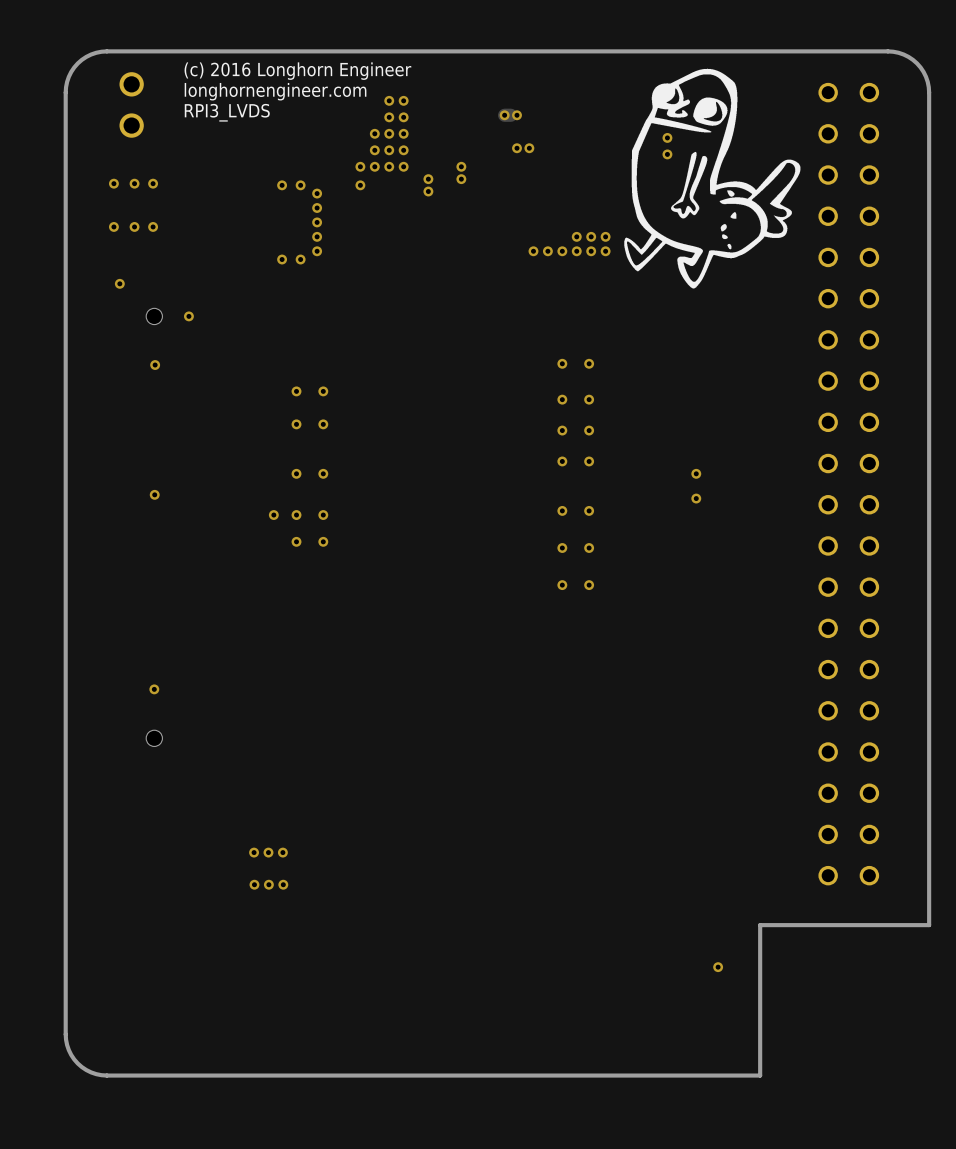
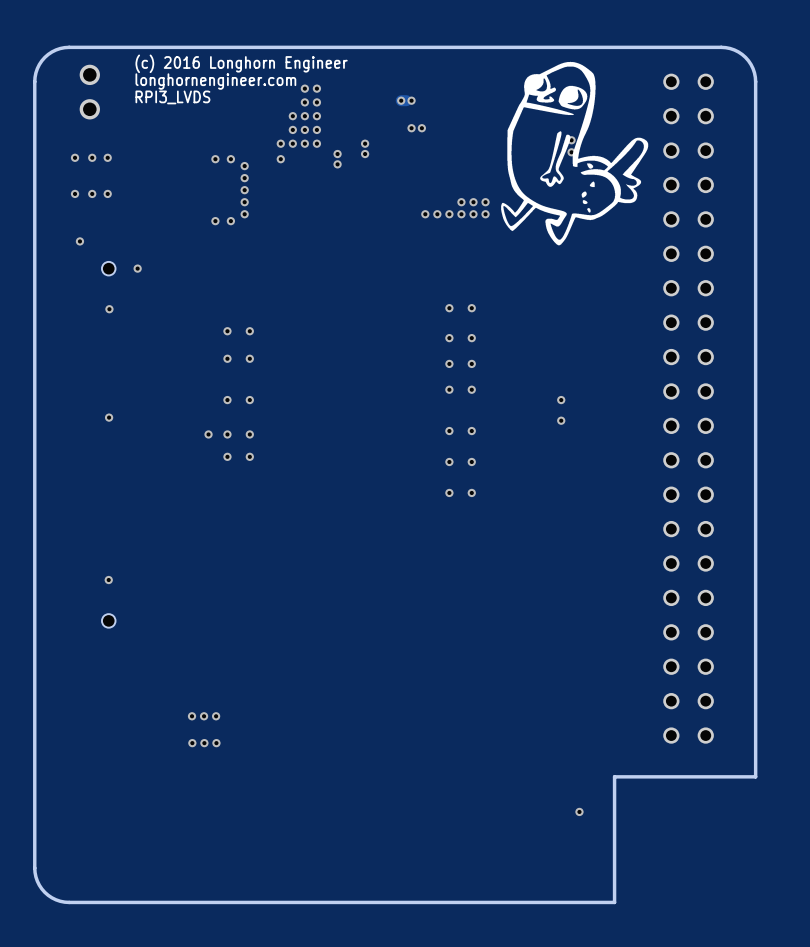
via: (667, 137) -> none
via: (667, 154) -> none
via: none -> (571, 140)
via: none -> (571, 152)

